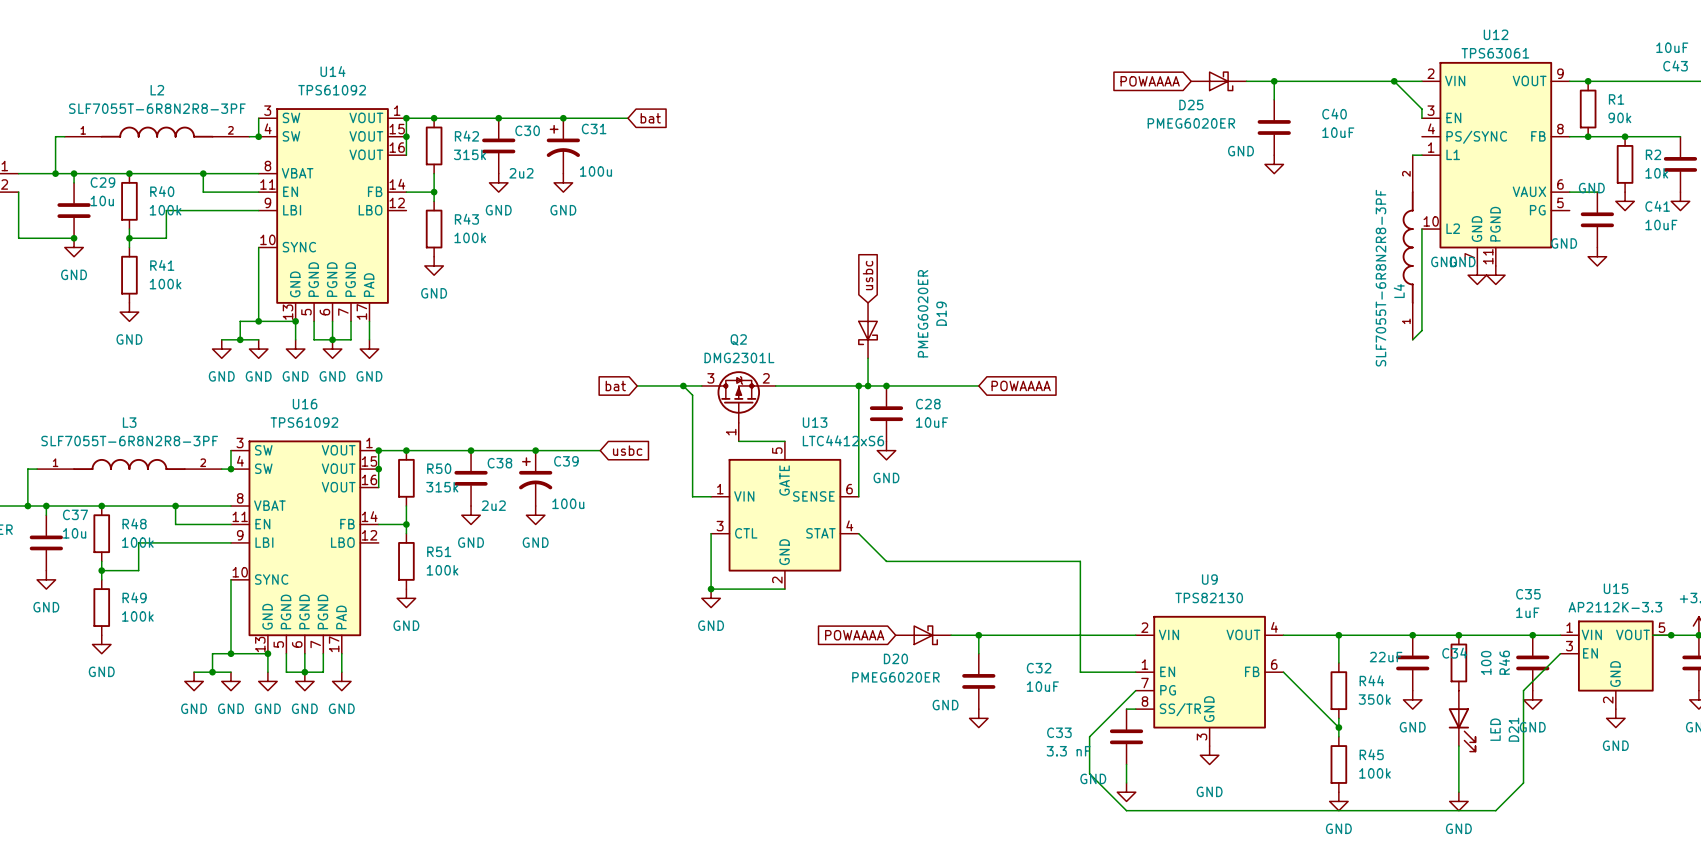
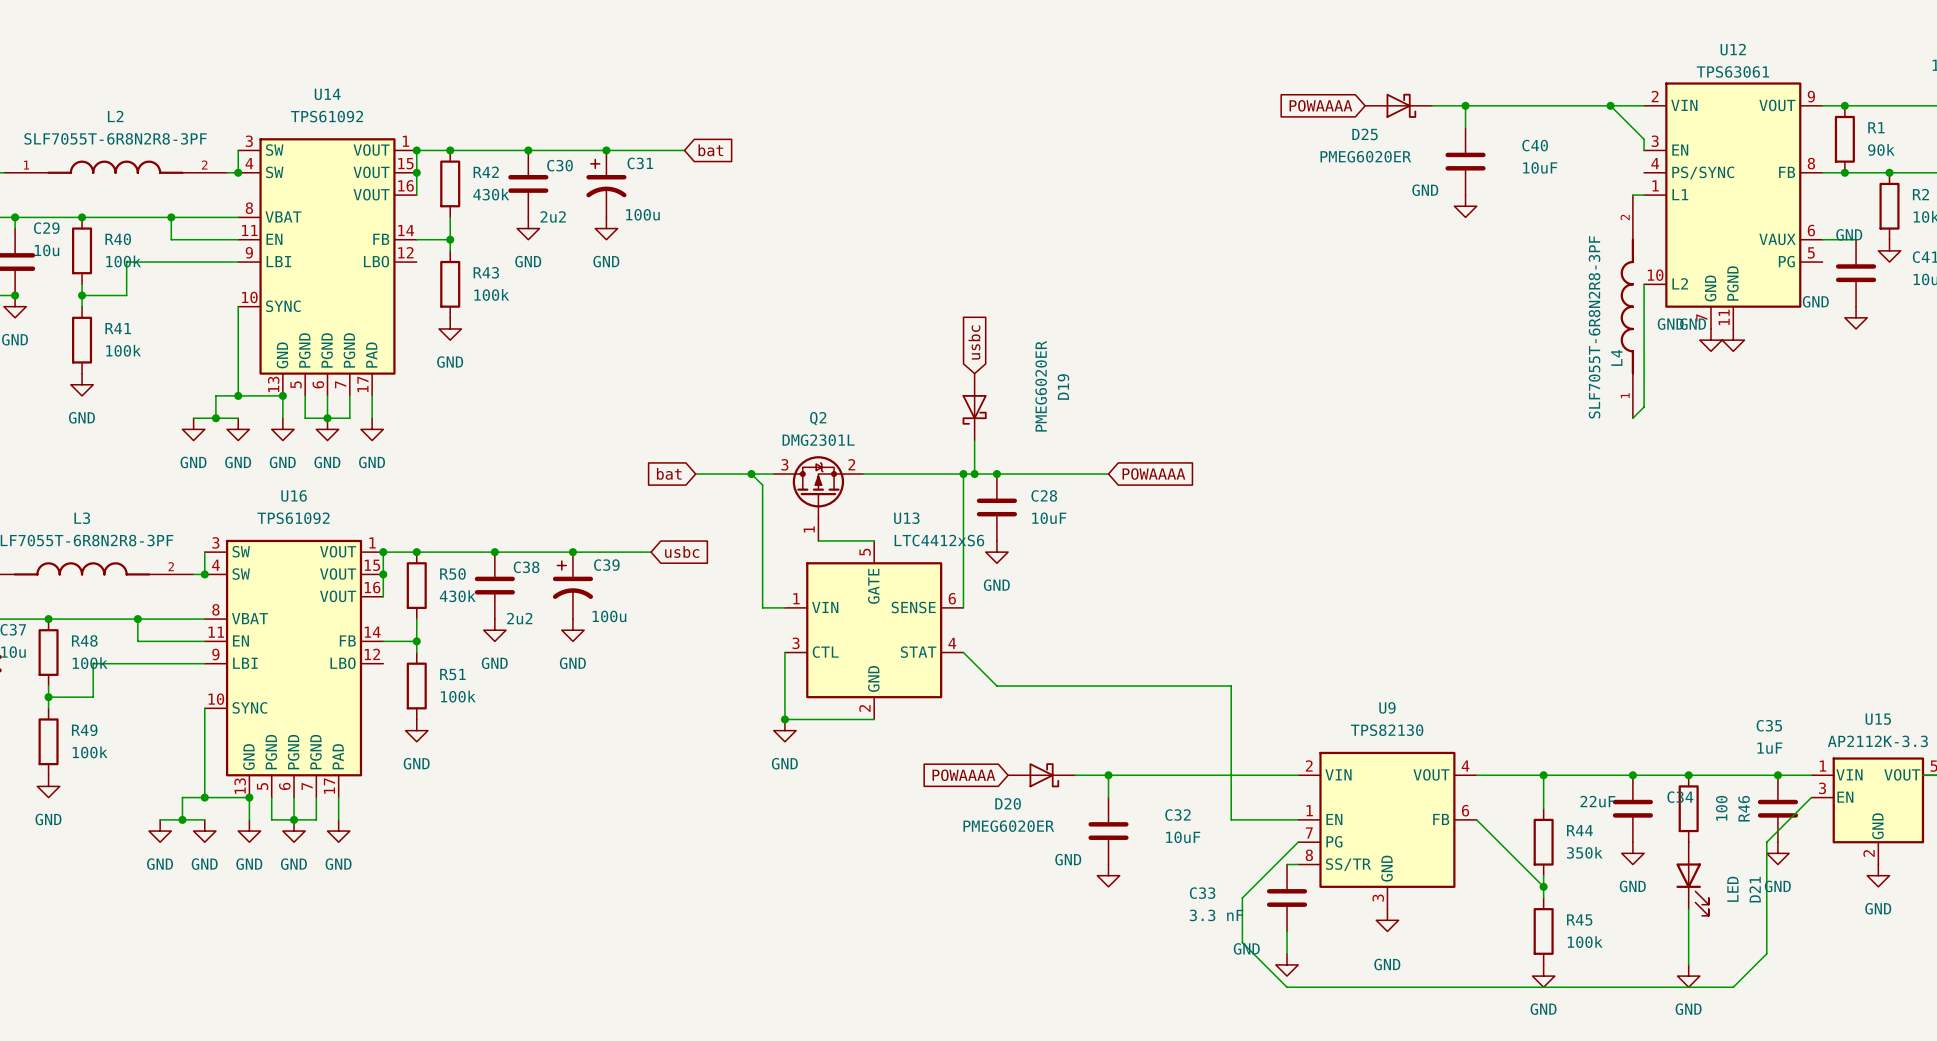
R42 value: 315k (470, 154) -> 430k (491, 194)
R50 value: 315k (442, 487) -> 430k (457, 596)

